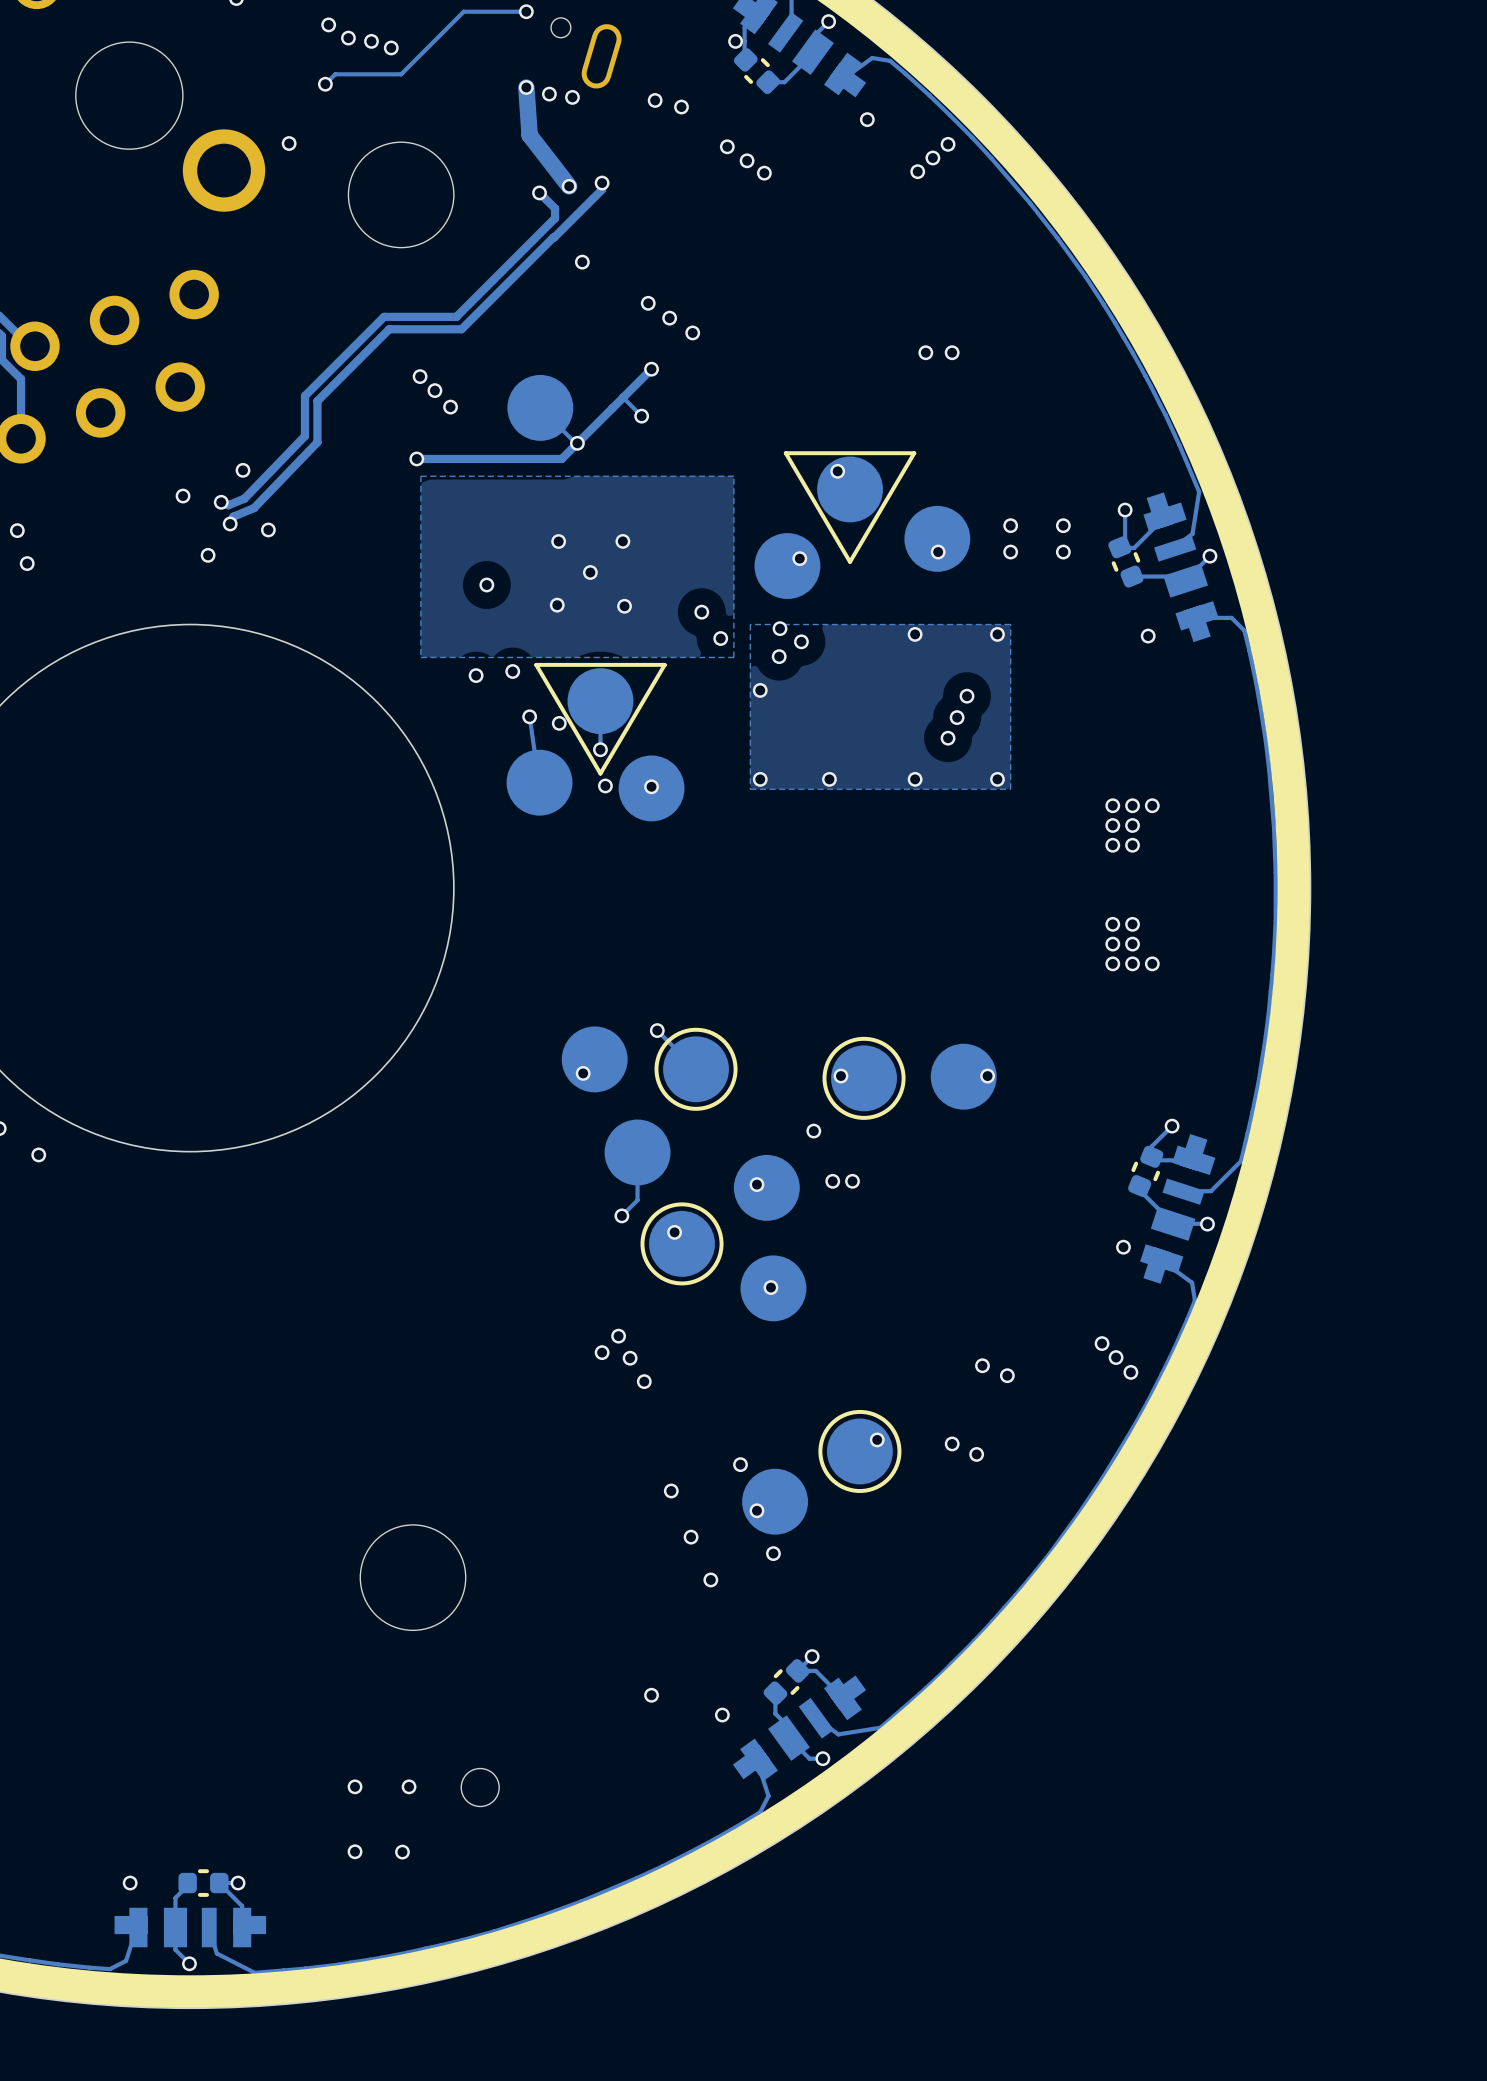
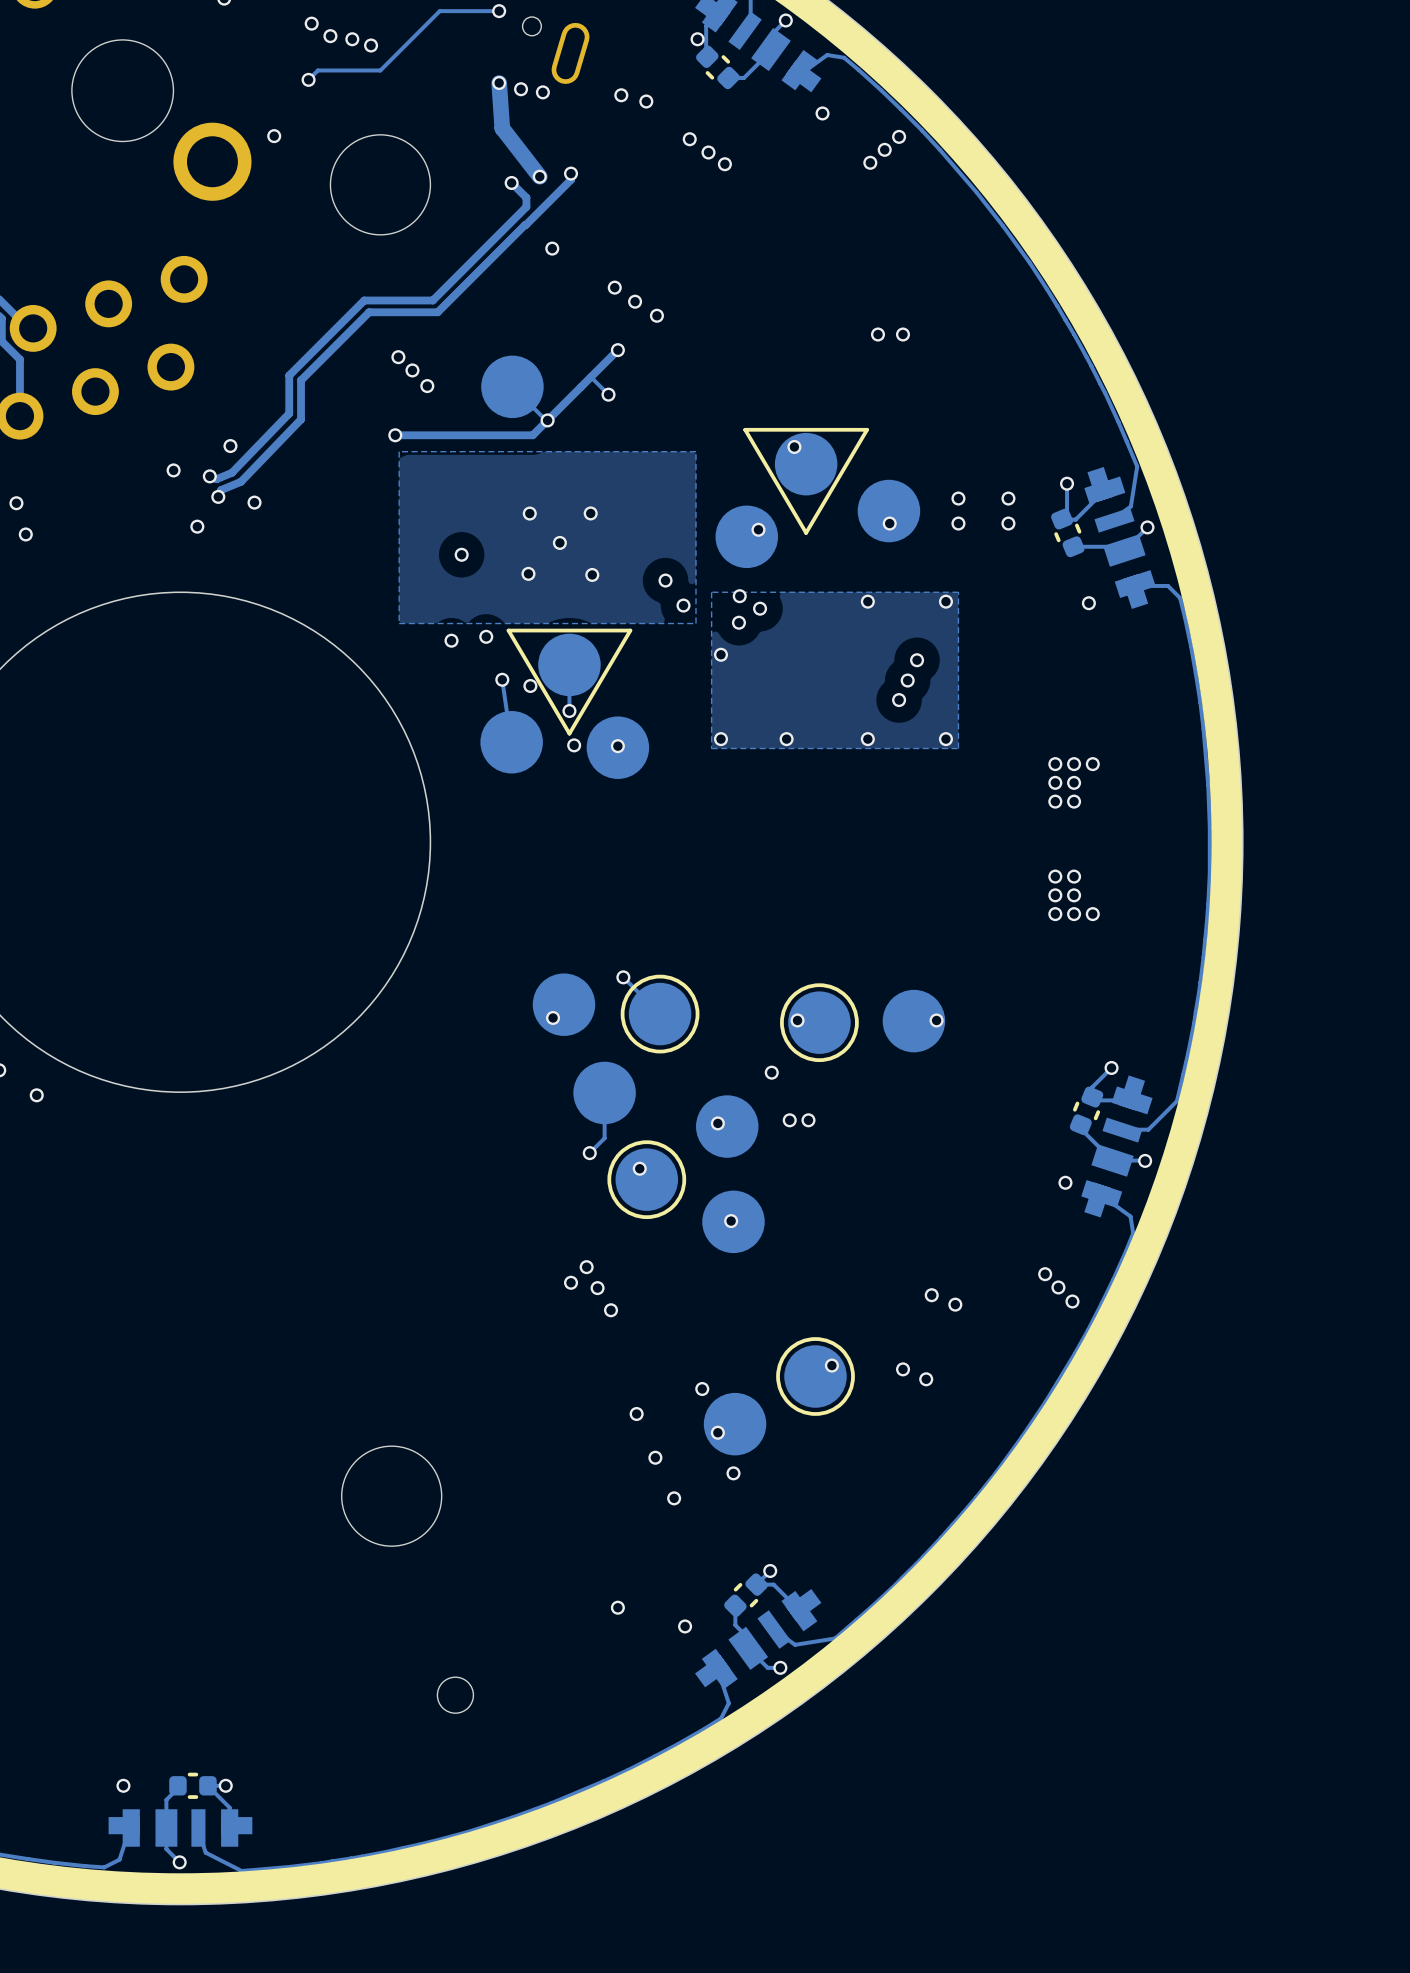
via: (355, 1786) -> none
via: (409, 1786) -> none
via: (355, 1851) -> none
via: (402, 1852) -> none

